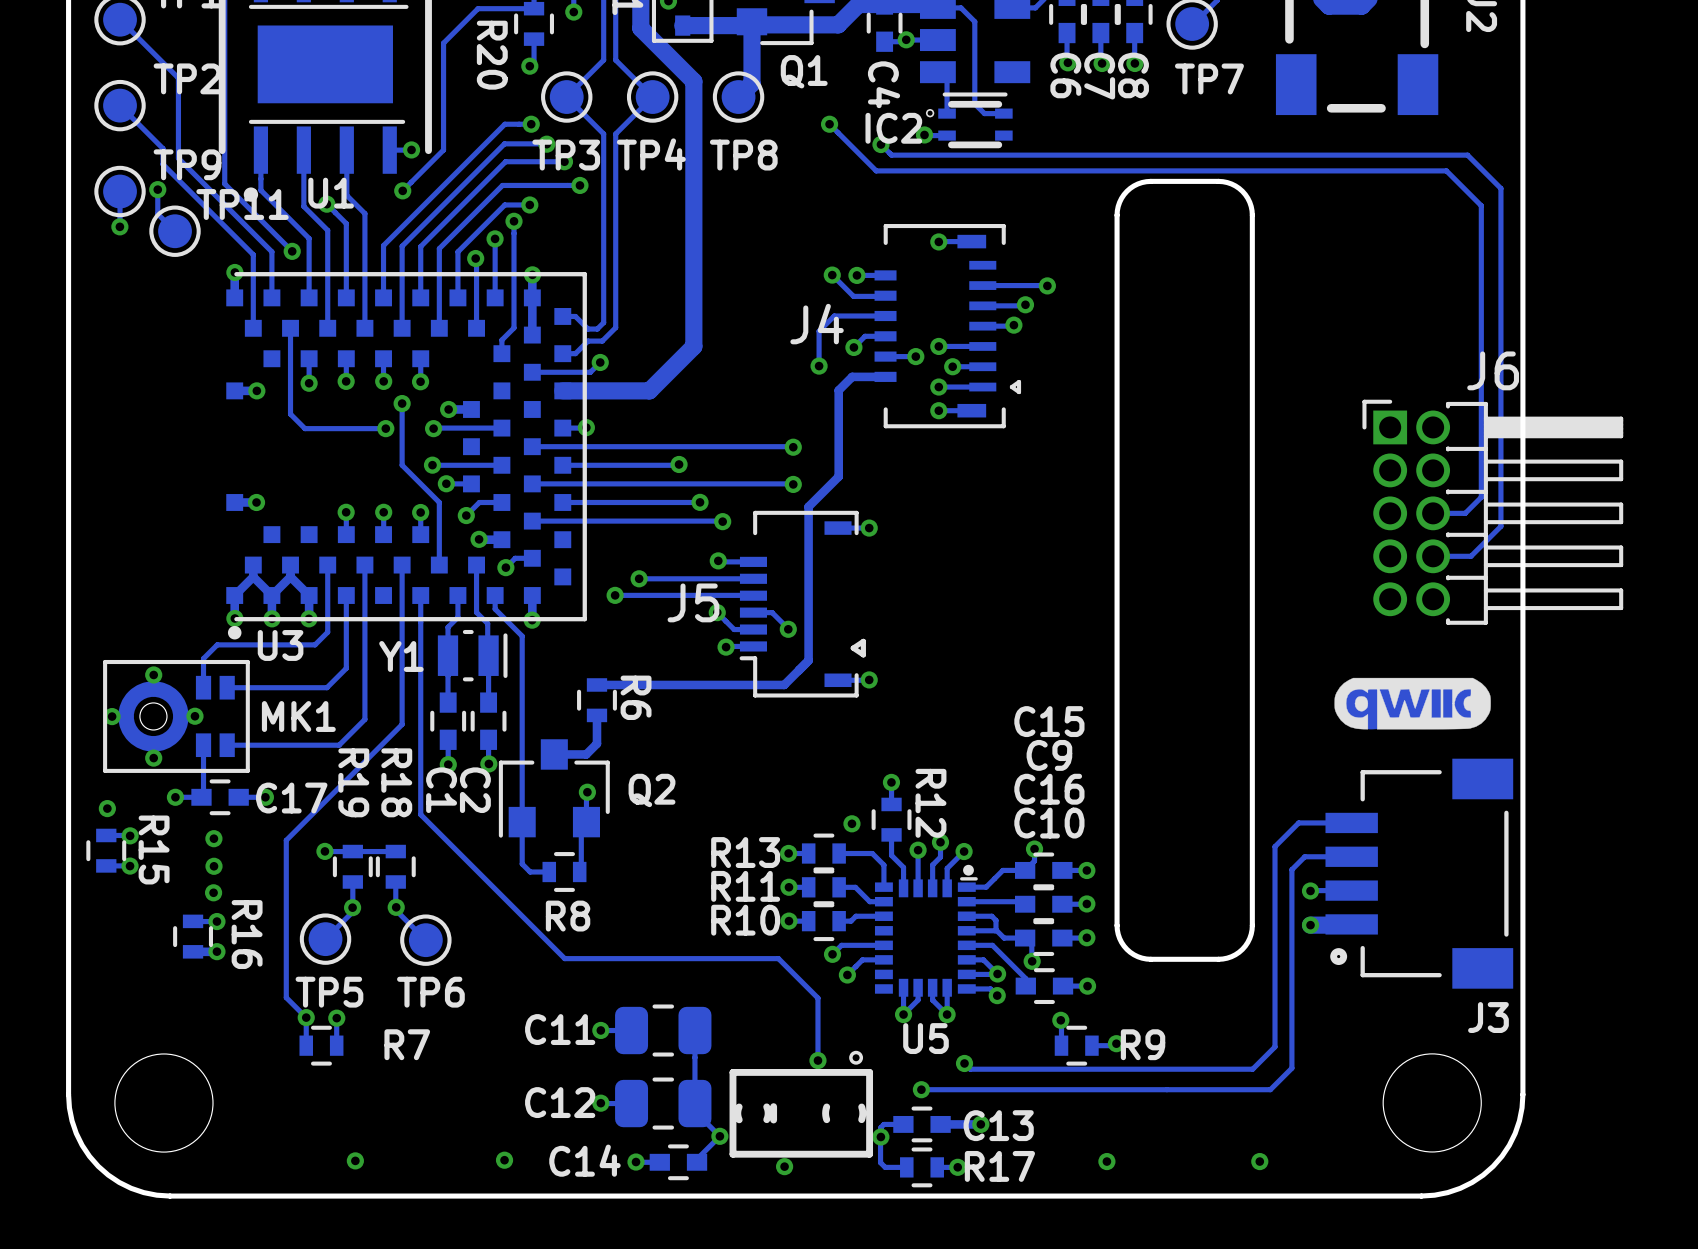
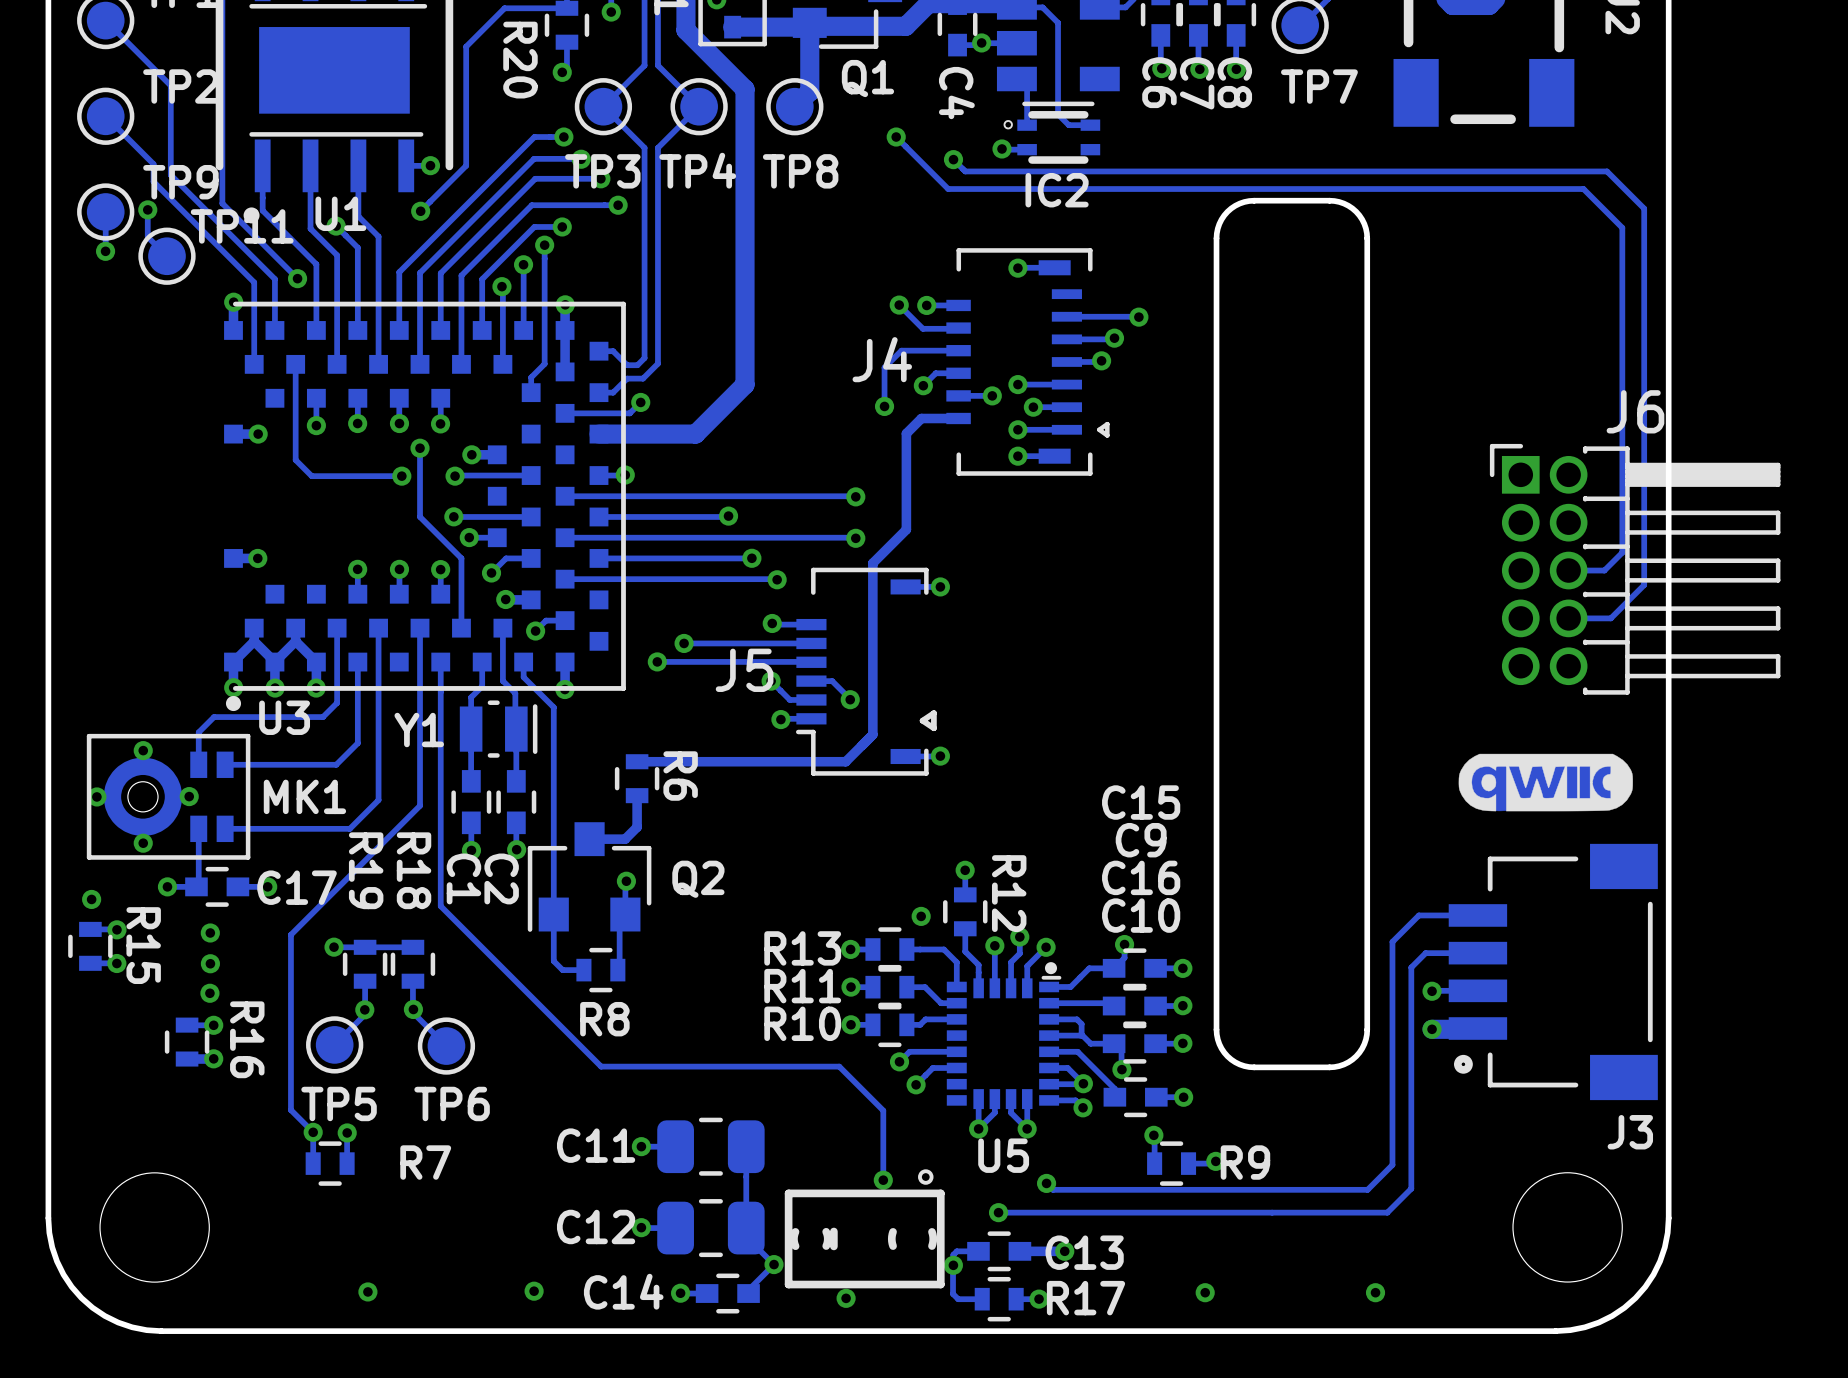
IC2 name position: IC2 (893, 128) -> IC2 (1057, 190)

